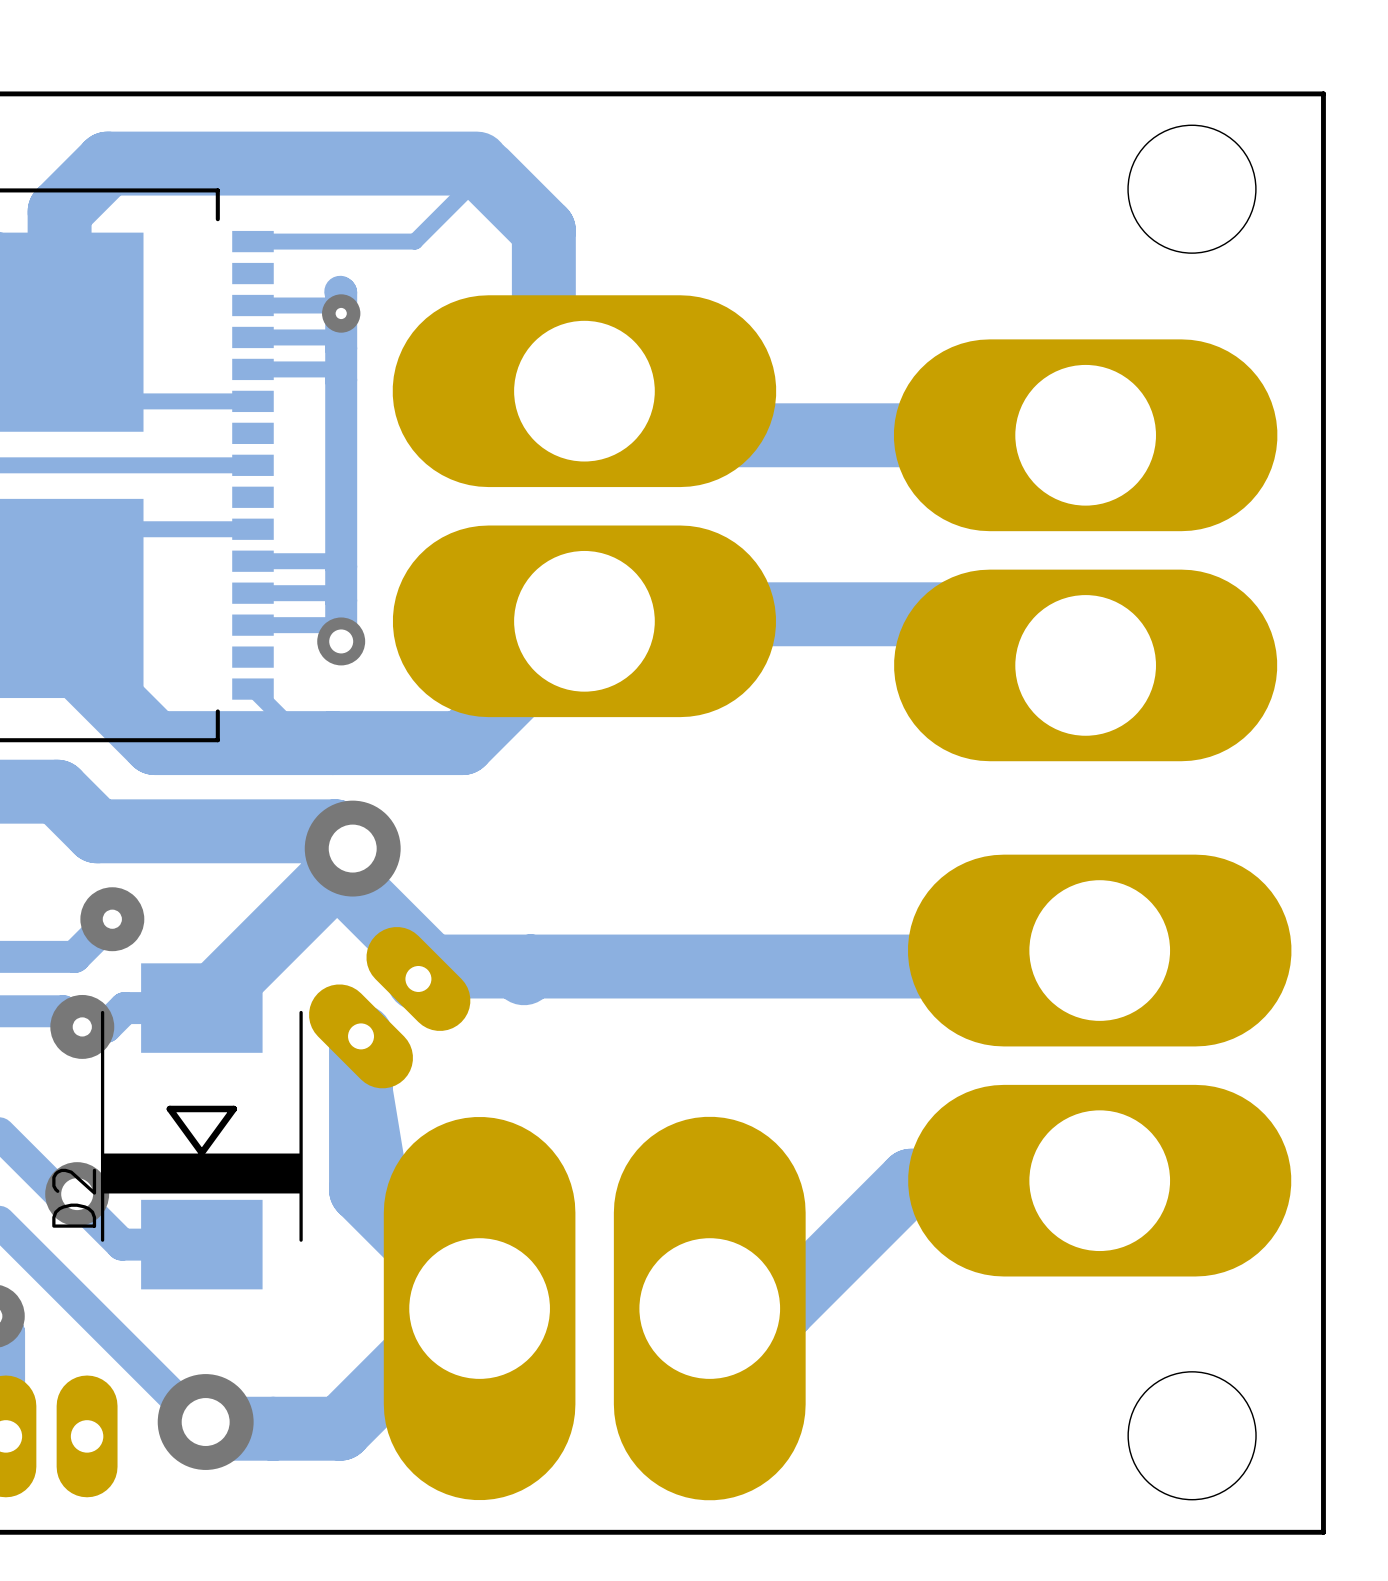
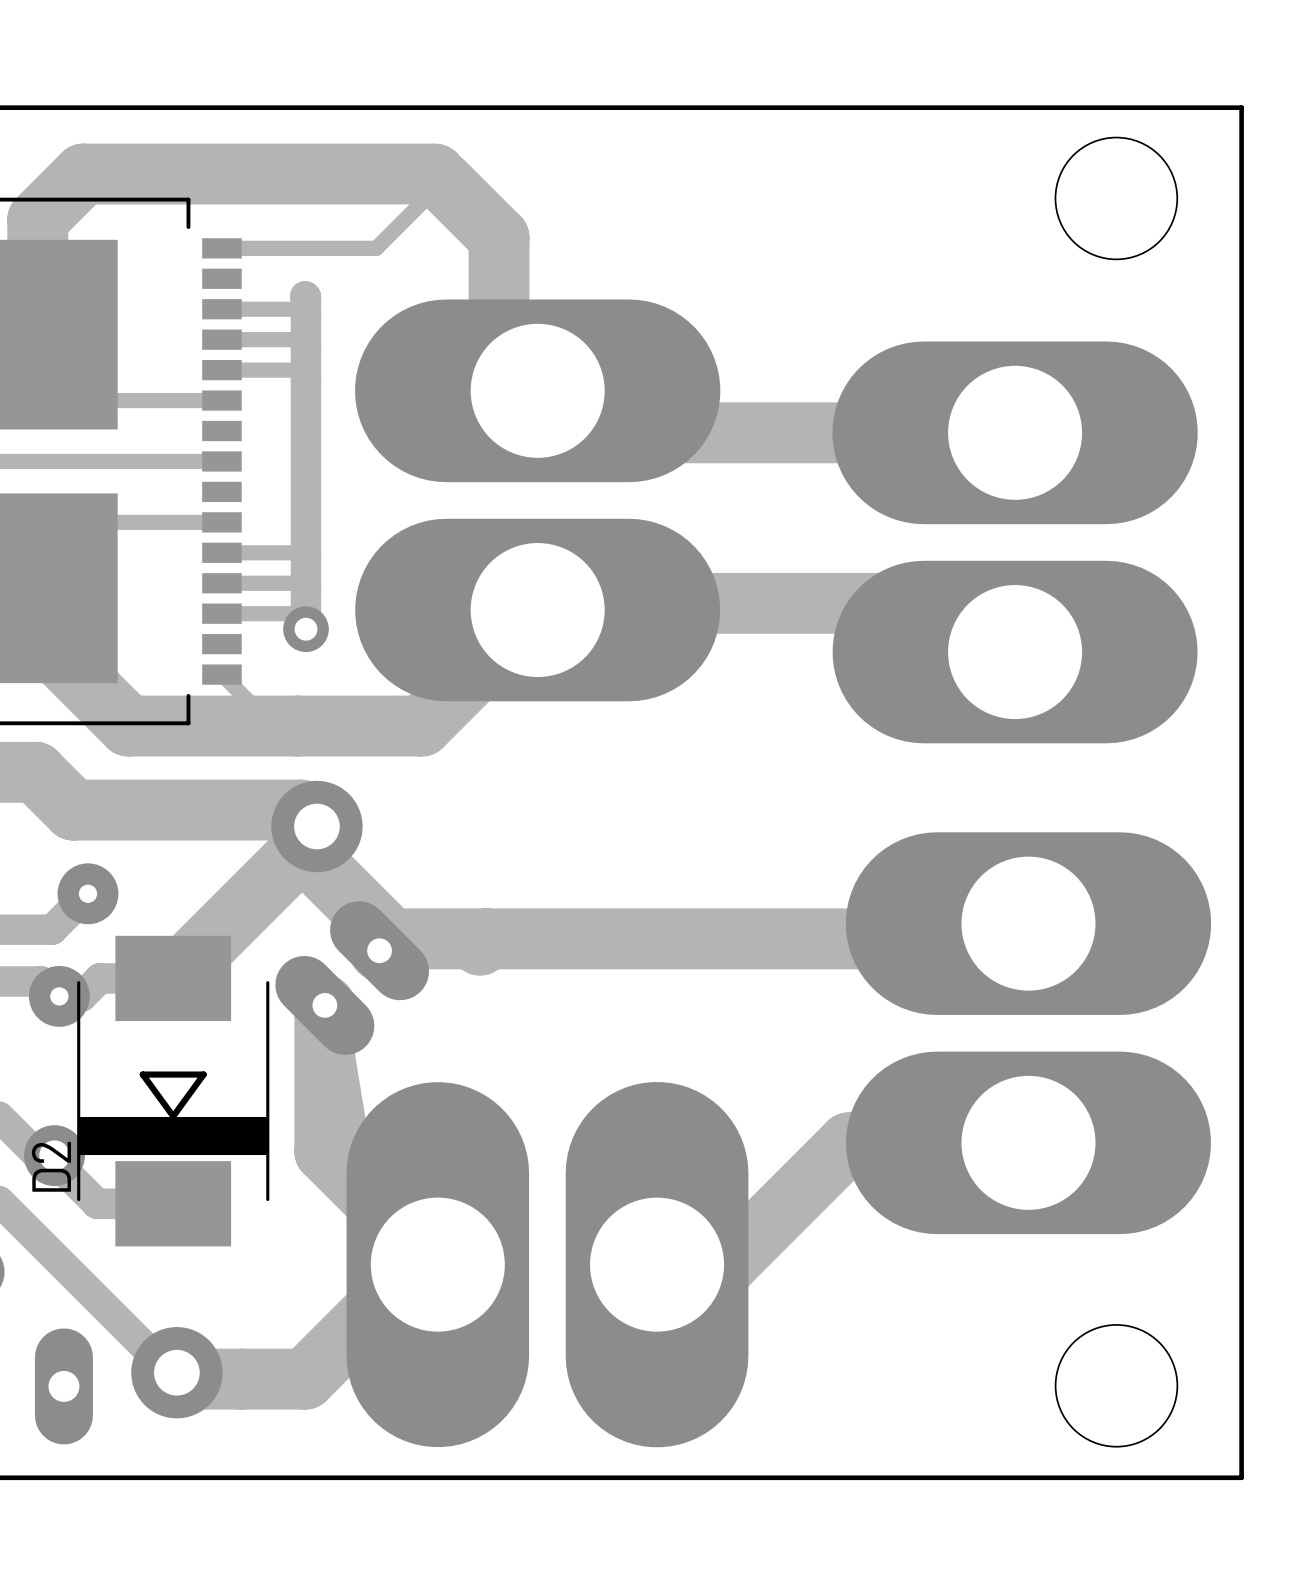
via: (341, 313) -> none

